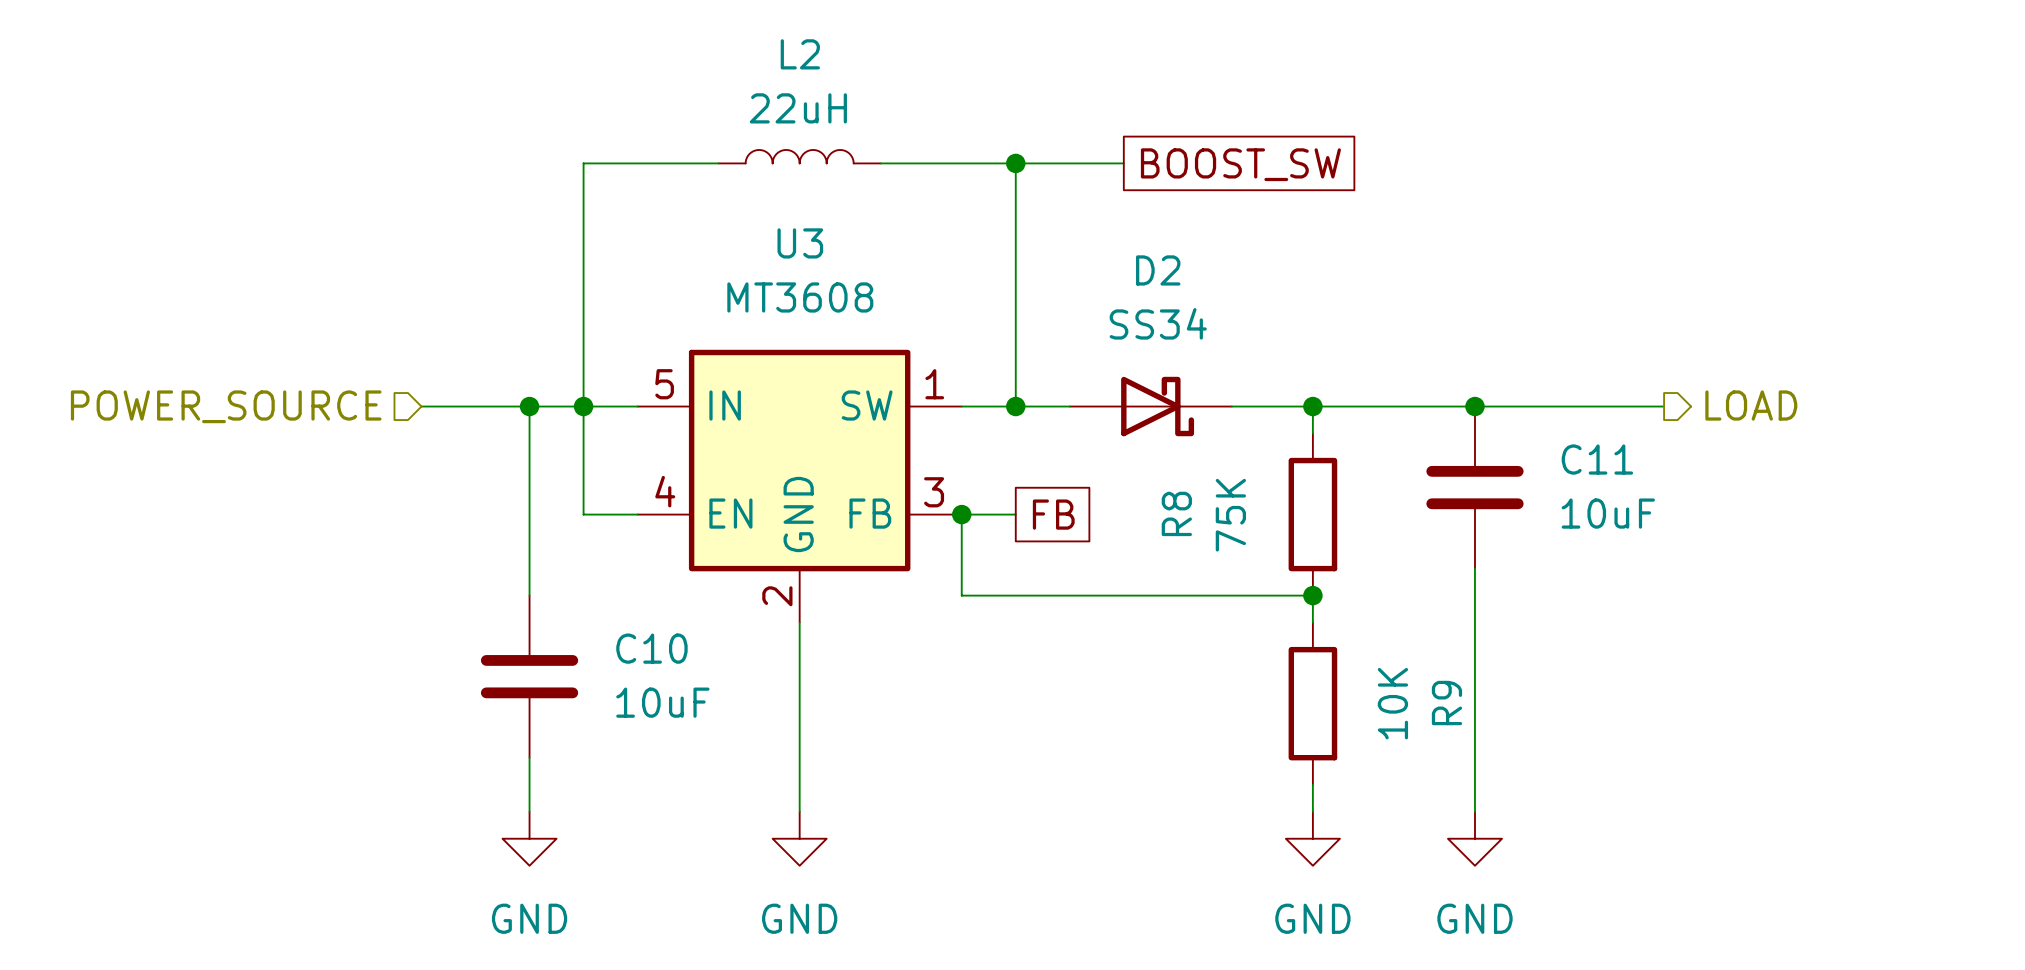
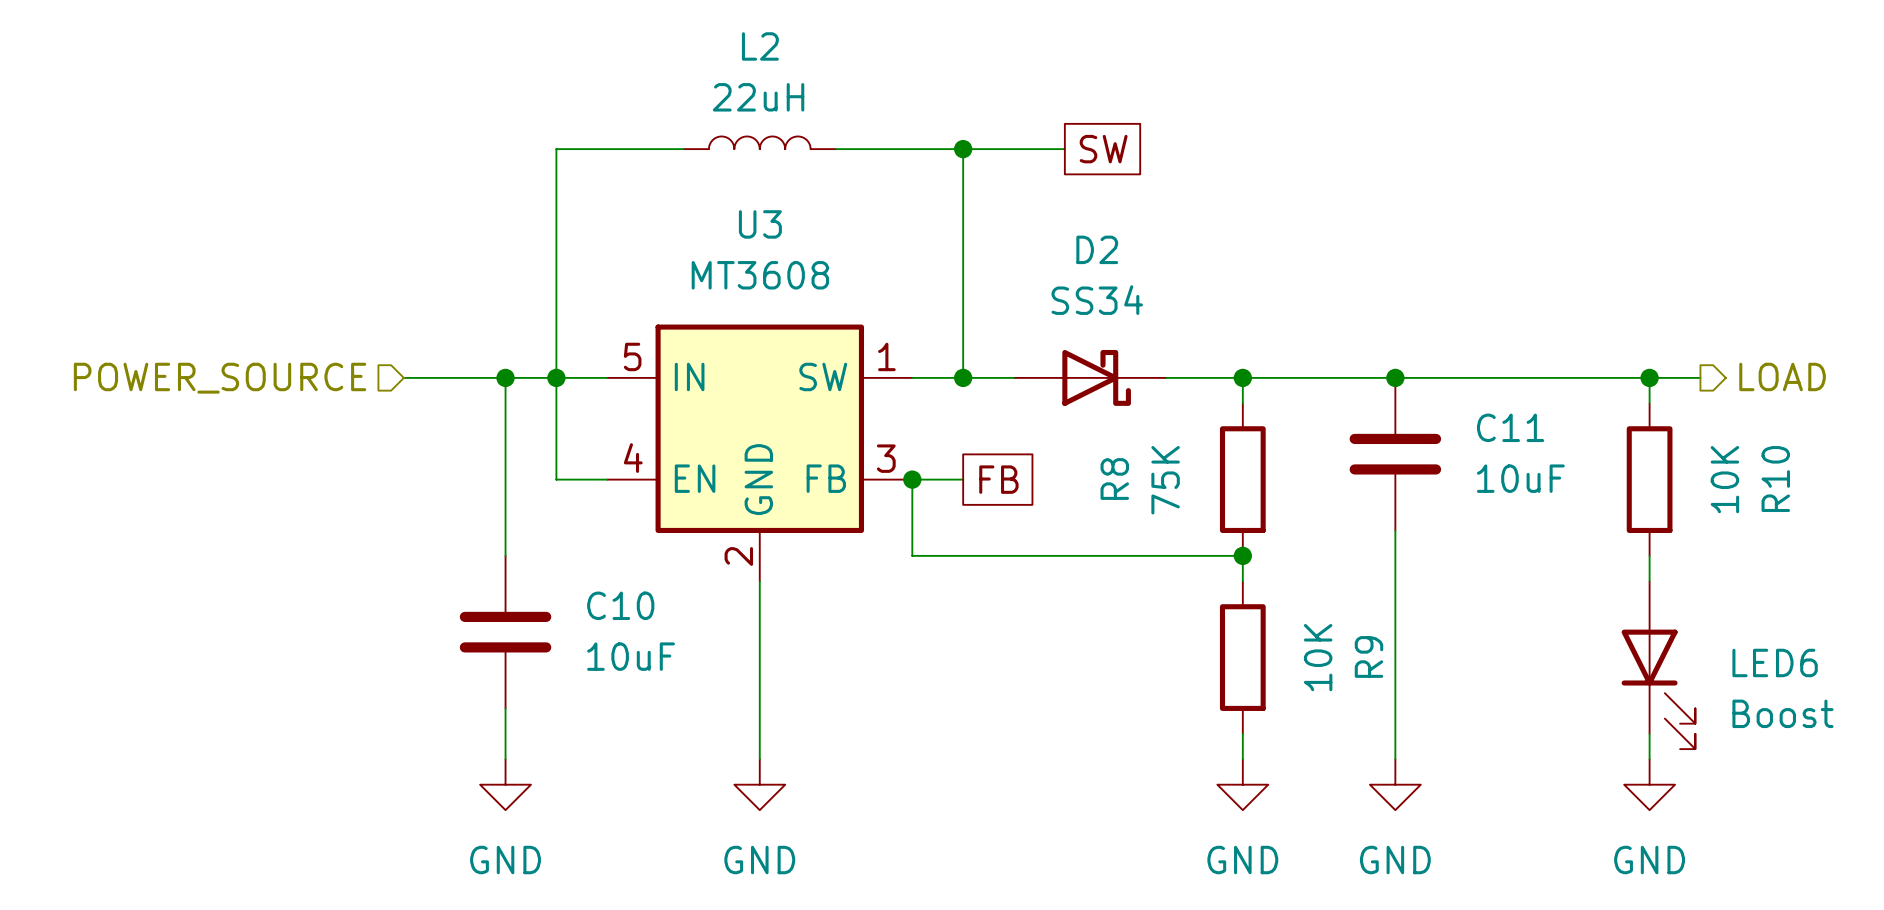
global label: BOOST_SW (1240, 164) -> SW (1103, 149)
hierarchical label position: LOAD (1751, 405) -> LOAD (1782, 376)
wire: none -> (1573, 377) (1700, 377)
wire: none -> (1649, 377) (1649, 403)
junction: none -> (1649, 377)
R10: none -> 10K (1649, 479)
wire: none -> (1649, 555) (1649, 581)
LED6: none -> Boost (1658, 665)
wire: none -> (1649, 733) (1649, 759)
power symbol: none -> GND (1649, 784)

